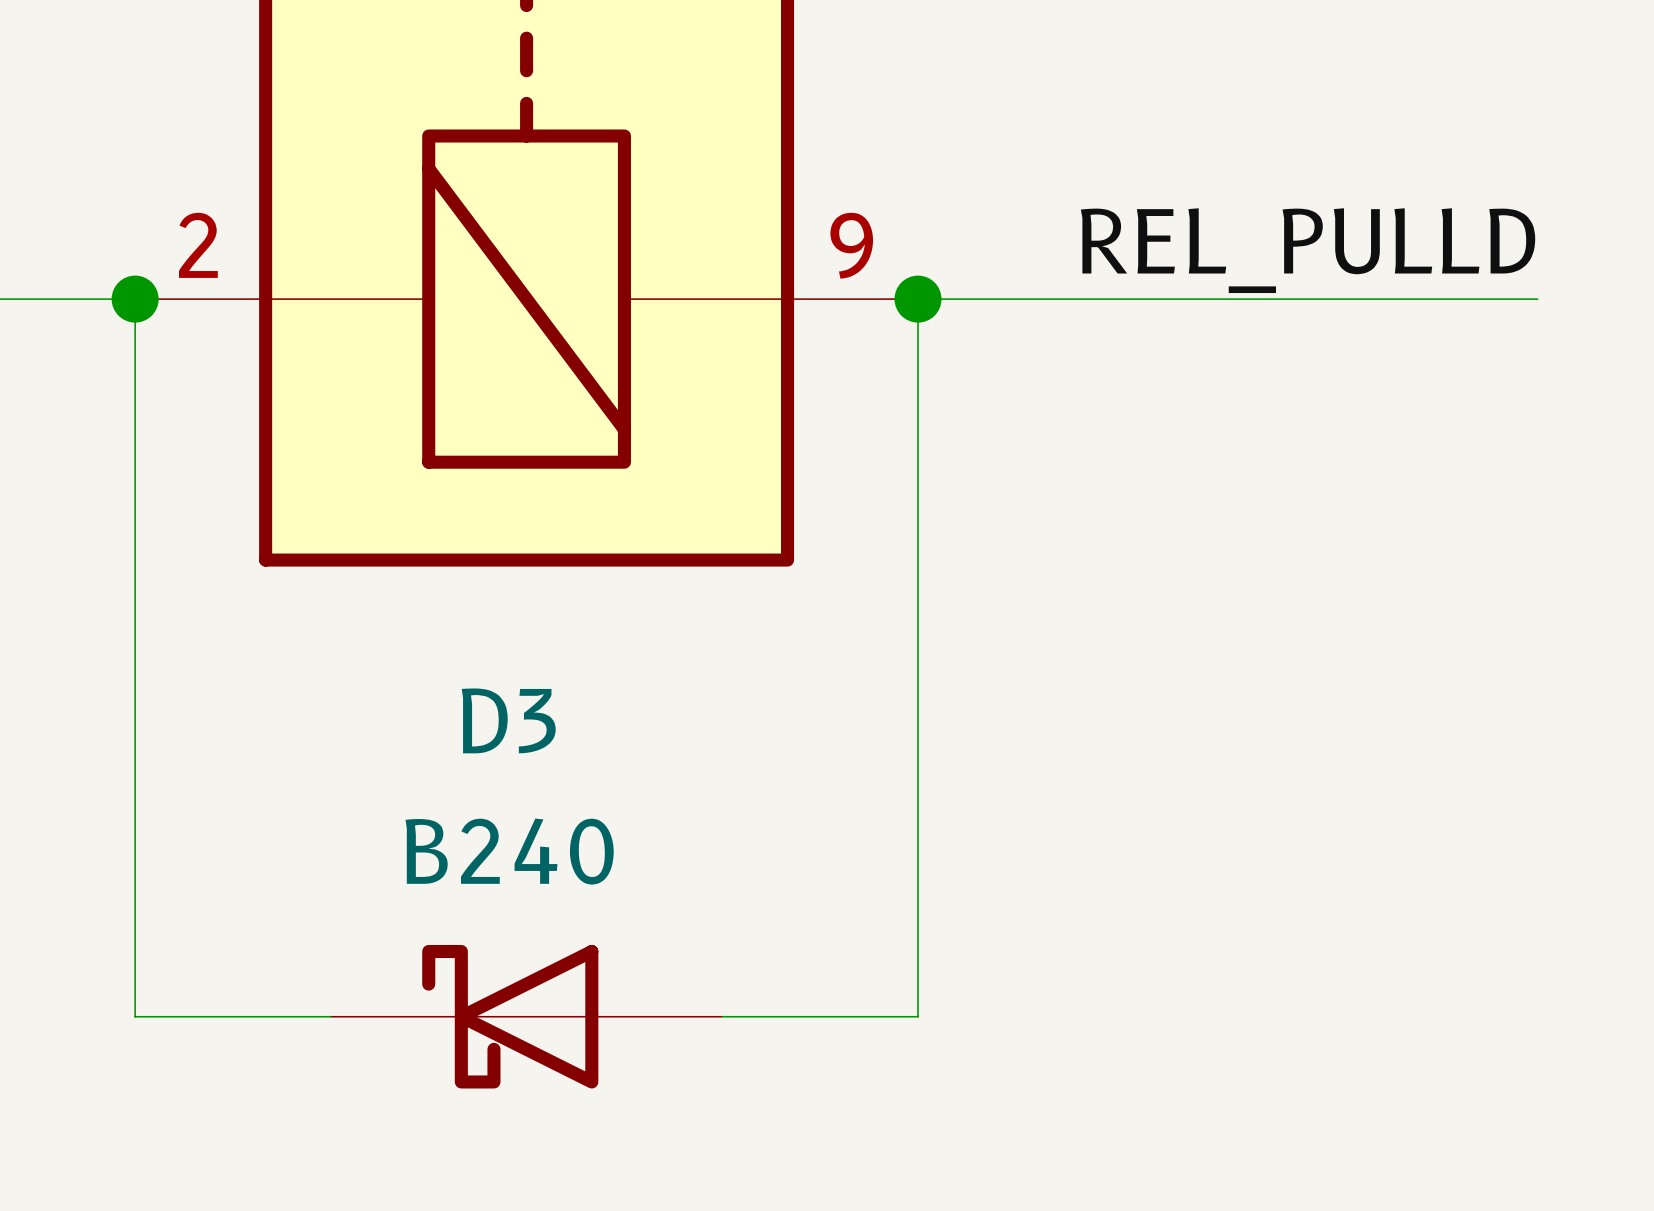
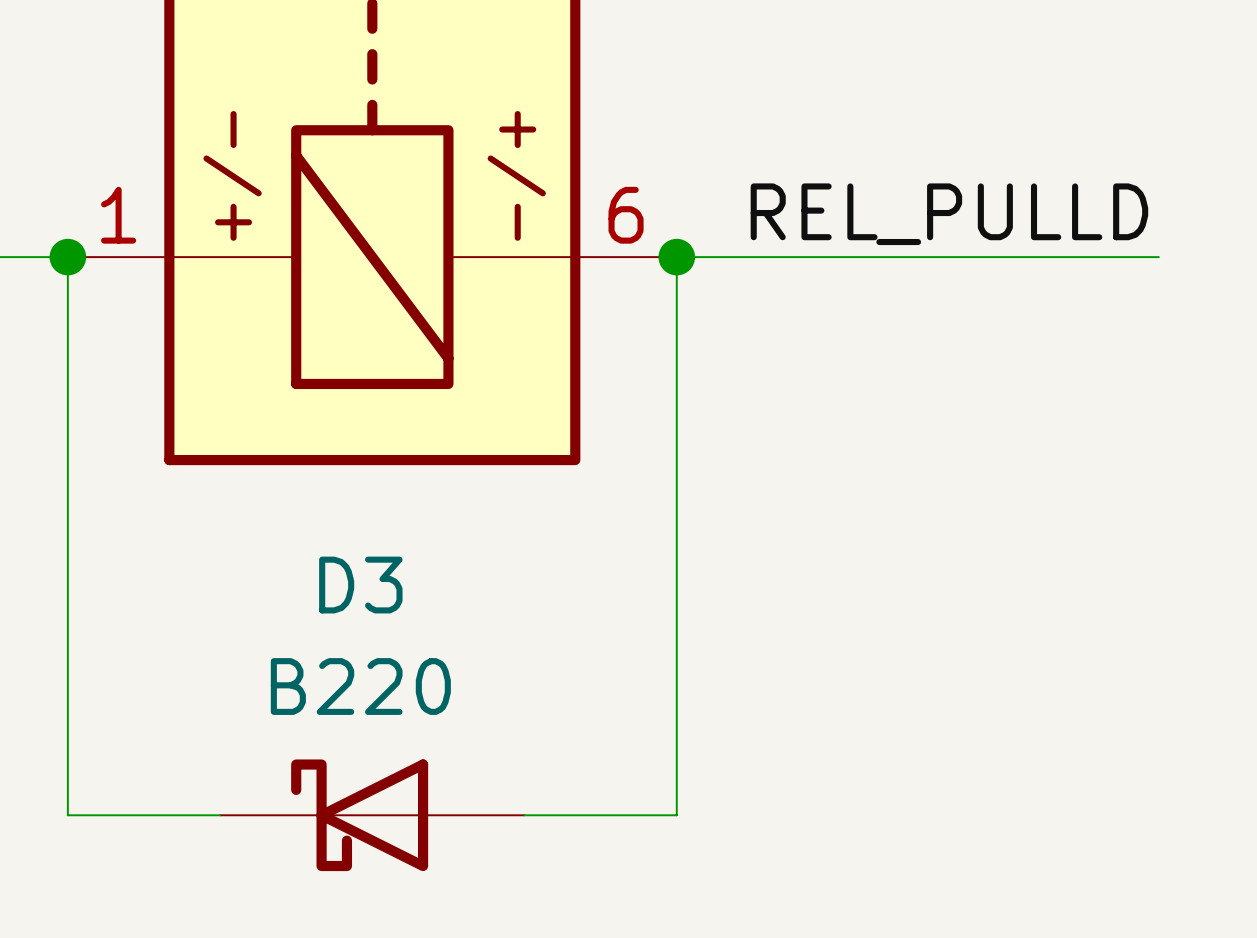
part text: none -> -/+ (516, 175)
part text: none -> +/- (232, 175)
part pin number: 2 (198, 245) -> 1 (118, 215)
part pin number: 9 (851, 245) -> 6 (626, 215)
D3 value: B240 (509, 851) -> B220 (360, 686)

